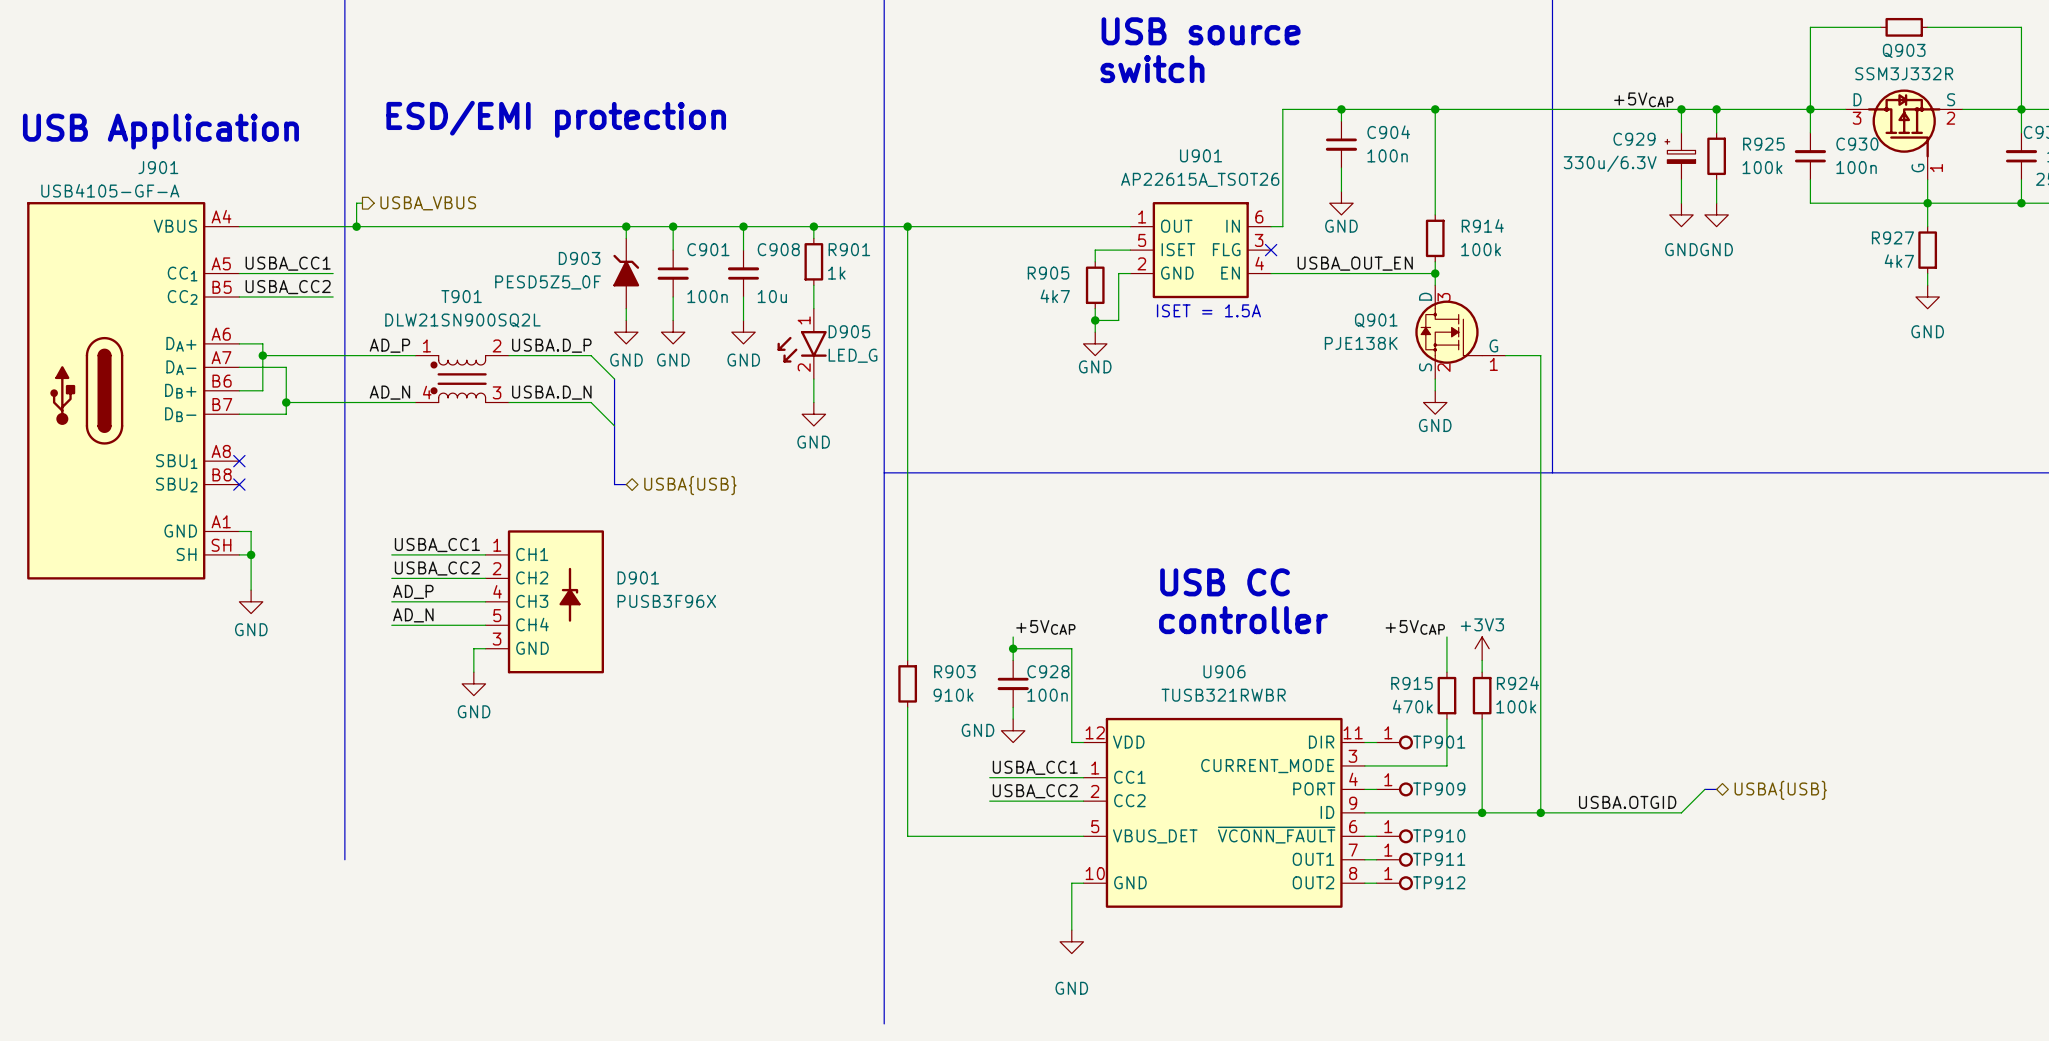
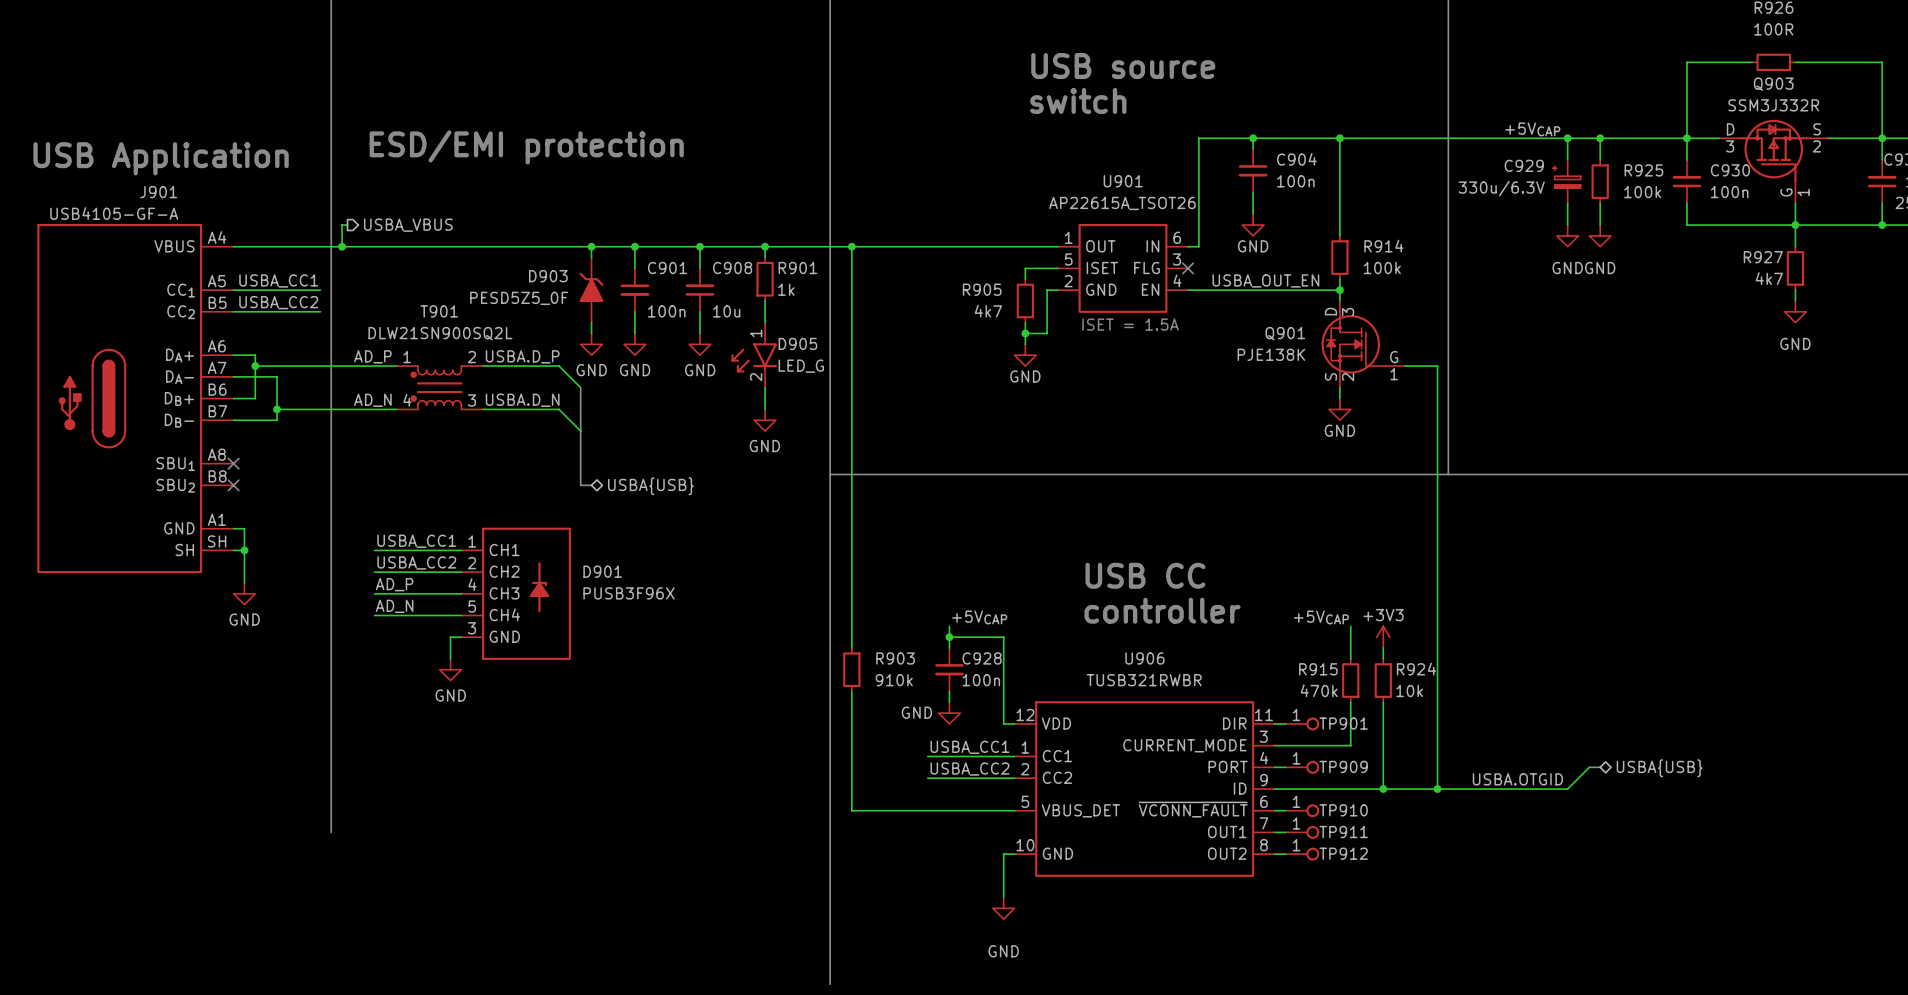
R924 text: 100k (1516, 706) -> 10k (1409, 691)

